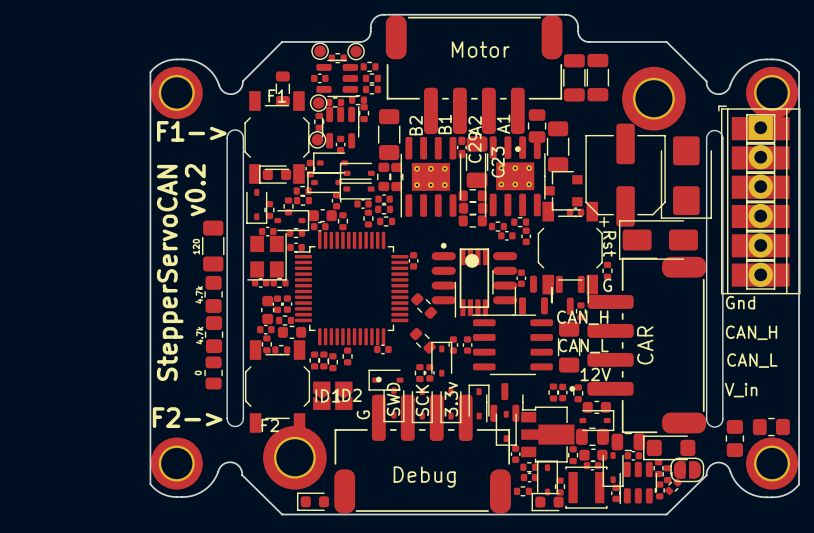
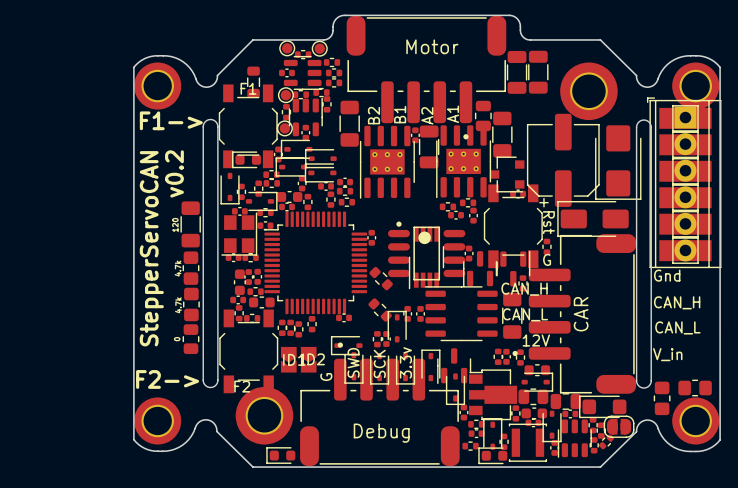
C29: (461, 147) -> none
part: none -> (415, 135)
part: none -> (429, 146)
C23: (477, 162) -> none
part: (383, 176) -> none
part: (396, 177) -> none
part: (472, 195) -> none
part: (473, 208) -> none
part: (472, 220) -> none

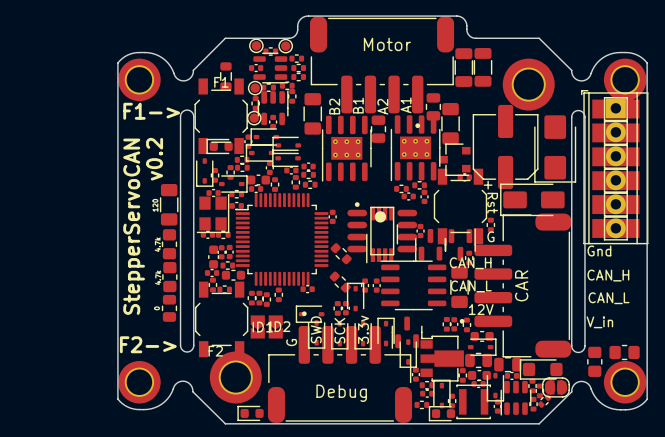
part: (415, 135) -> none
part: none -> (378, 129)
part: (429, 146) -> none

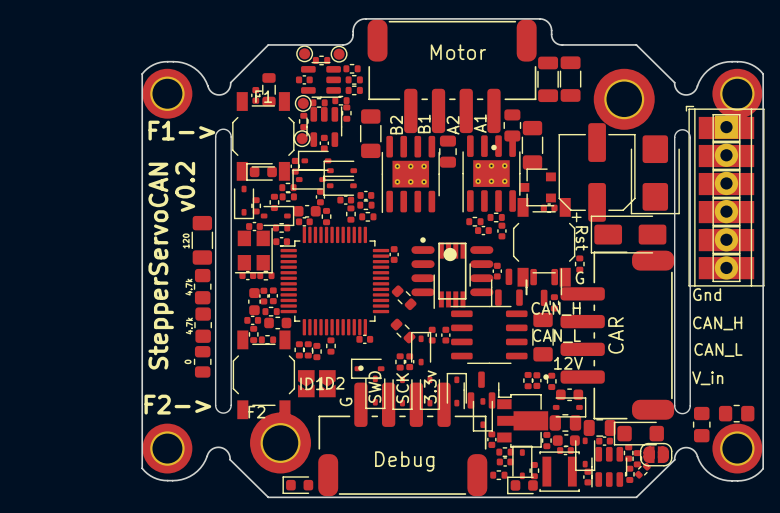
part: none -> (255, 95)

